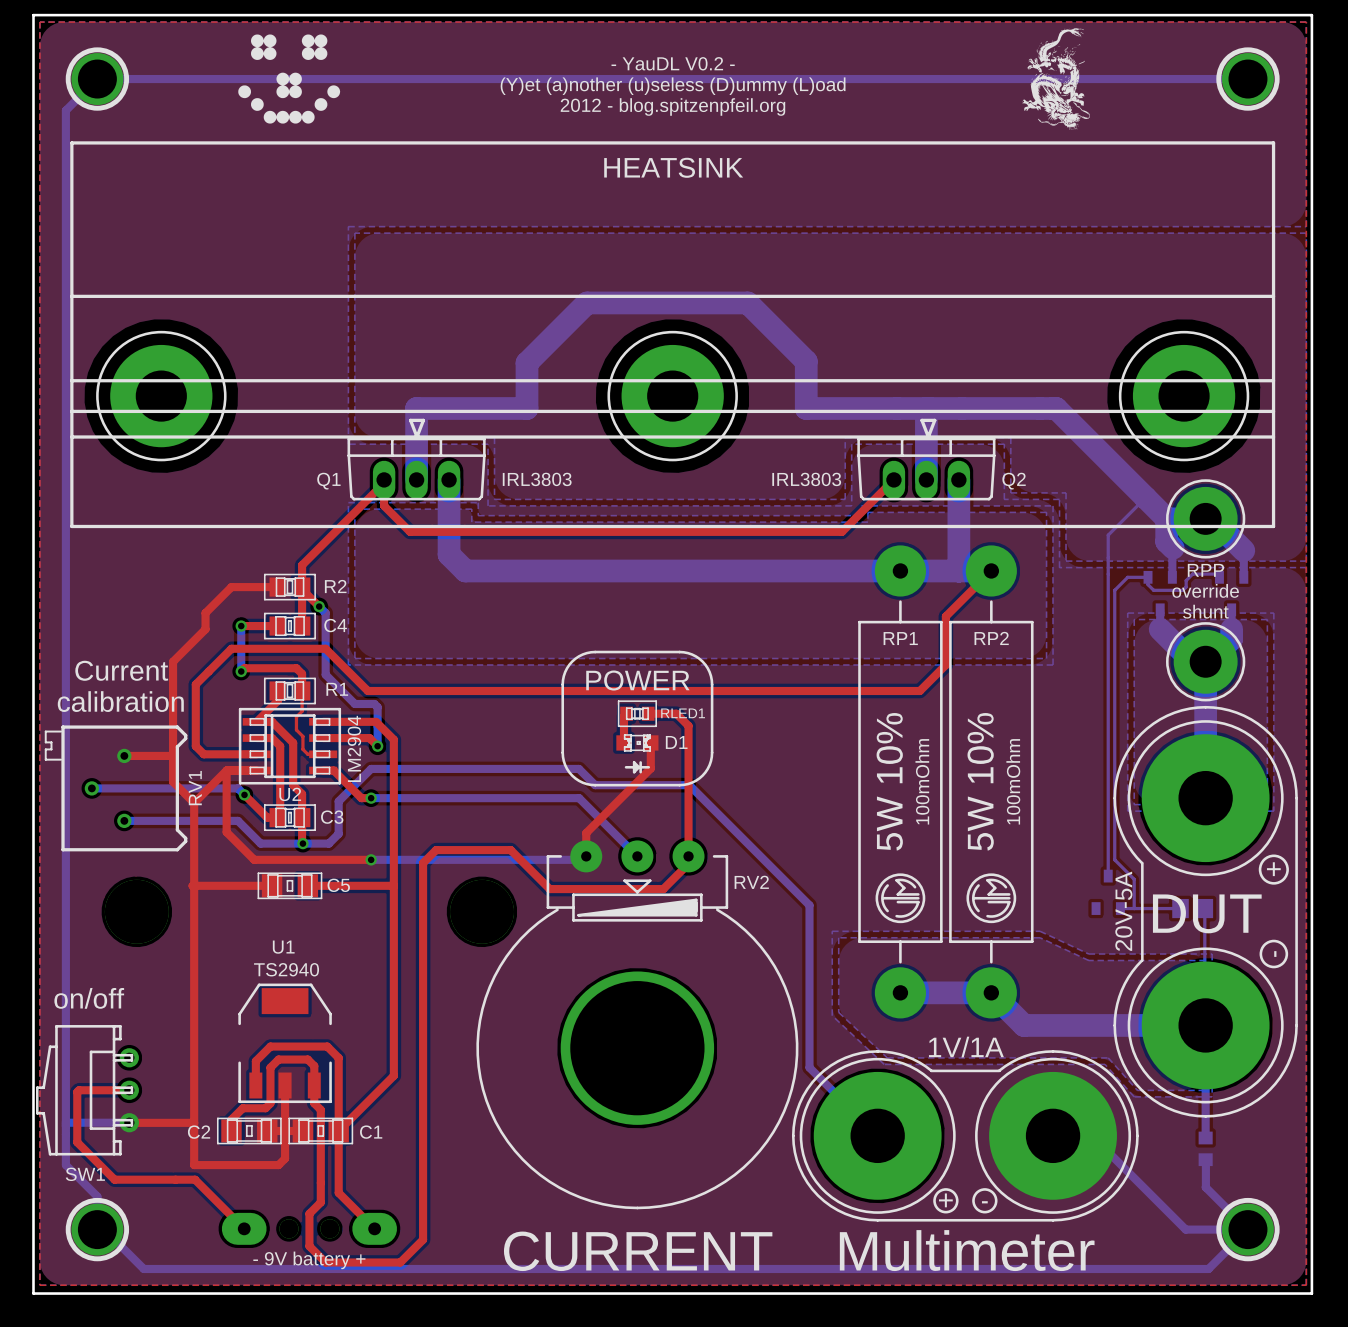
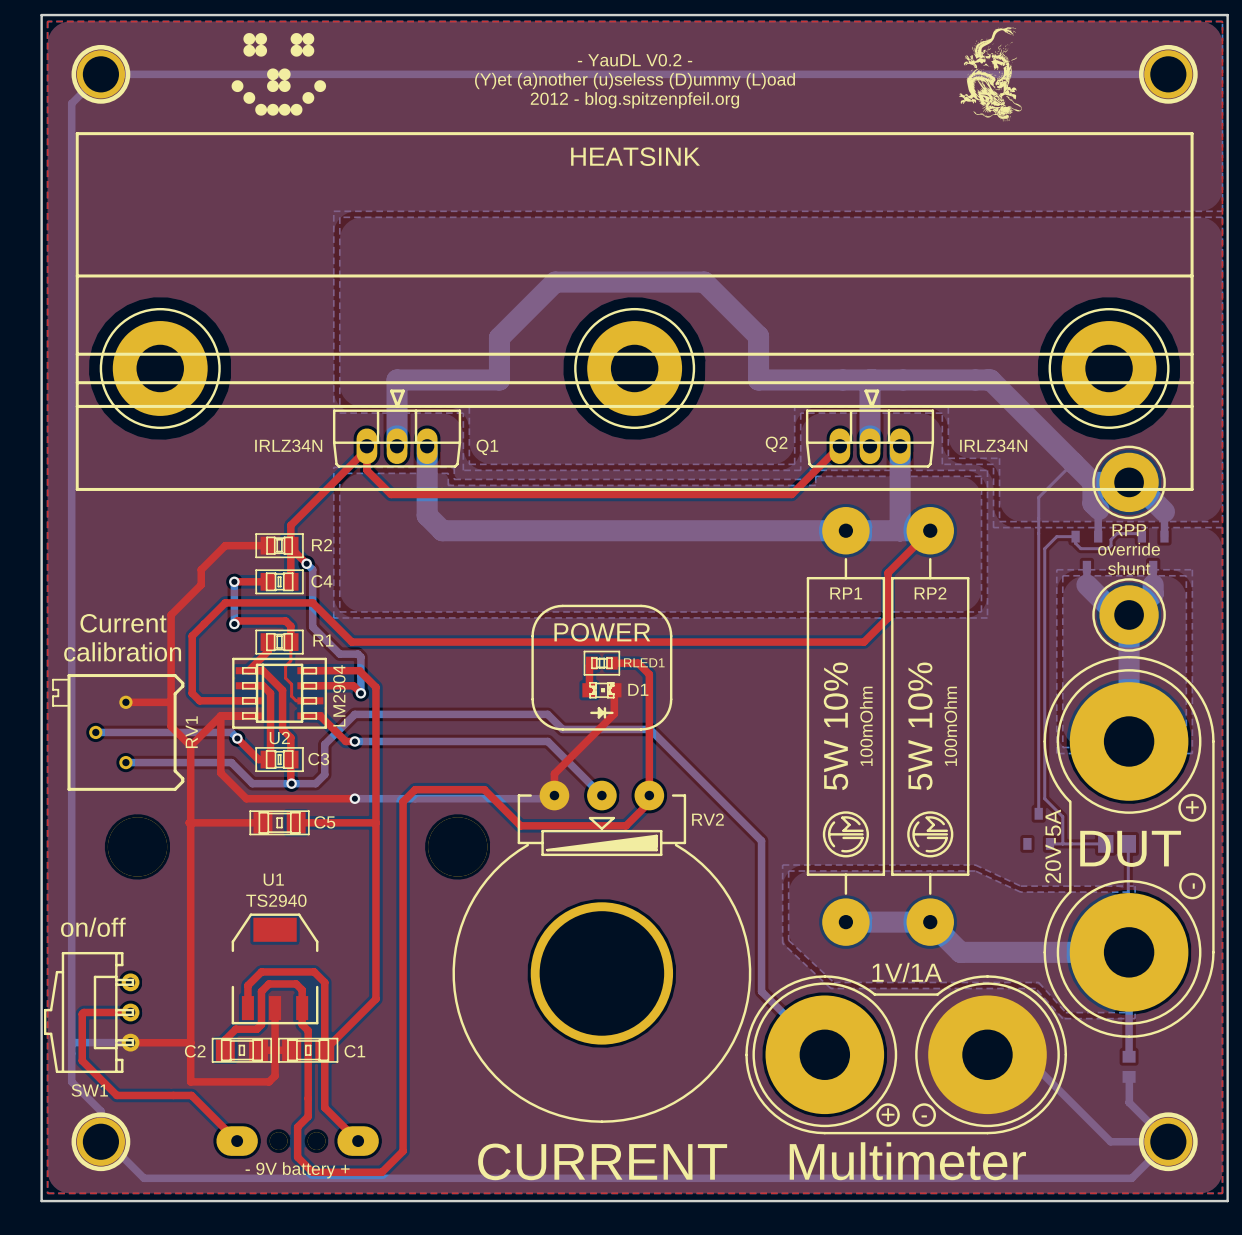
Q1 footprint: [347, 437, 486, 501] -> [332, 409, 462, 468]
Q2 footprint: [857, 437, 996, 501] -> [805, 409, 935, 468]
Q1 value: IRL3803 (537, 479) -> IRLZ34N (288, 445)
Q2 value: IRL3803 (806, 479) -> IRLZ34N (993, 445)
Q1 name position: Q1 (328, 481) -> Q1 (487, 447)
Q2 name position: Q2 (1014, 481) -> Q2 (776, 444)

